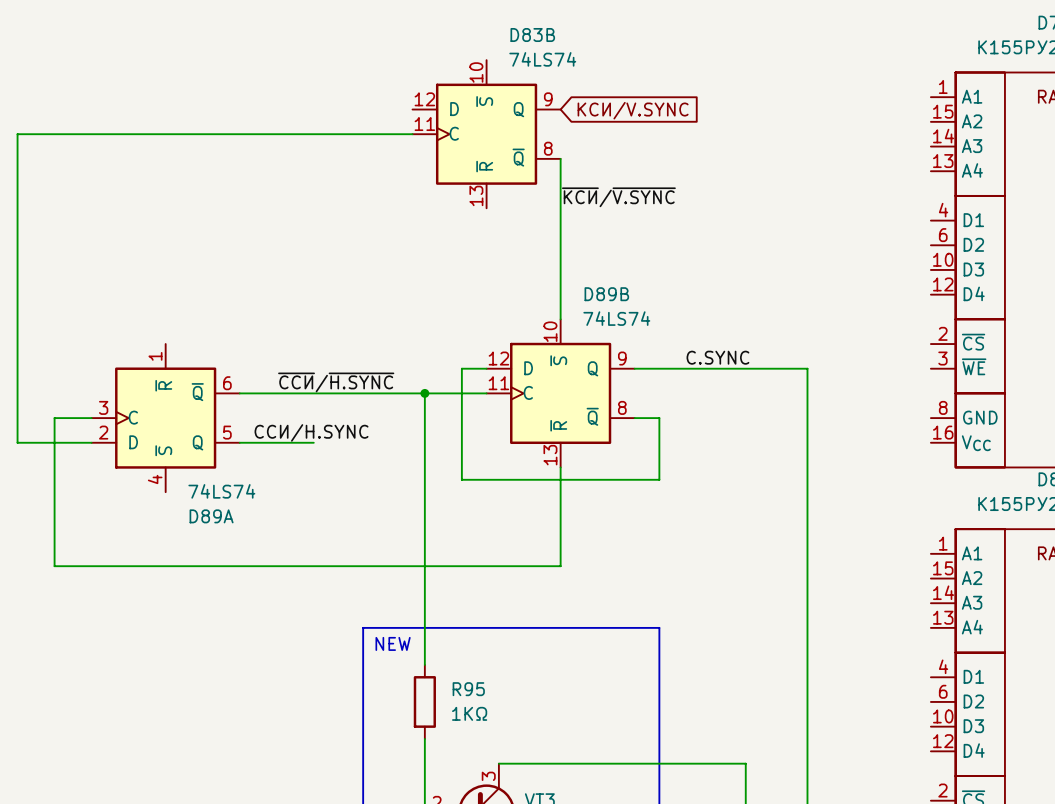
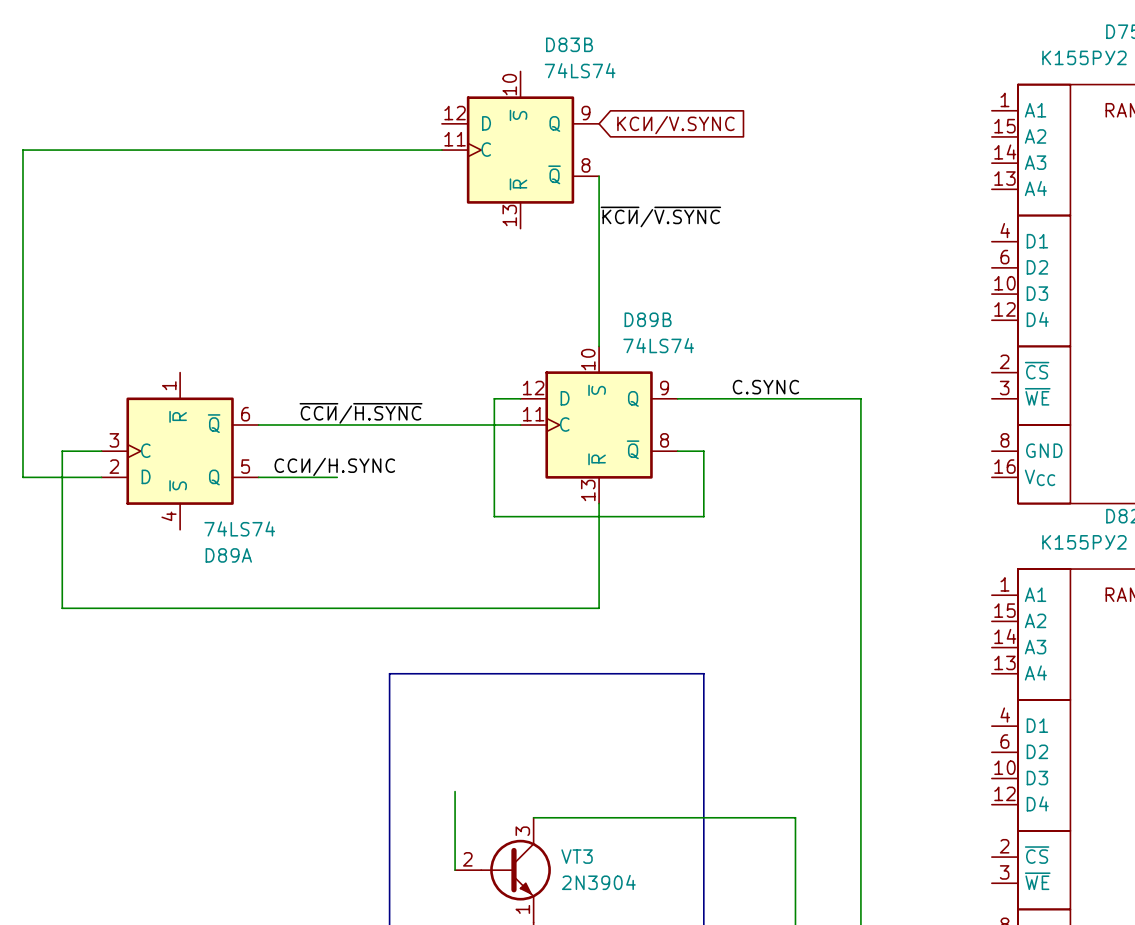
wire: (424, 393) (424, 664) -> none
junction: (424, 393) -> none
text: NEW (393, 643) -> none
R95: 1KΩ (424, 701) -> none

